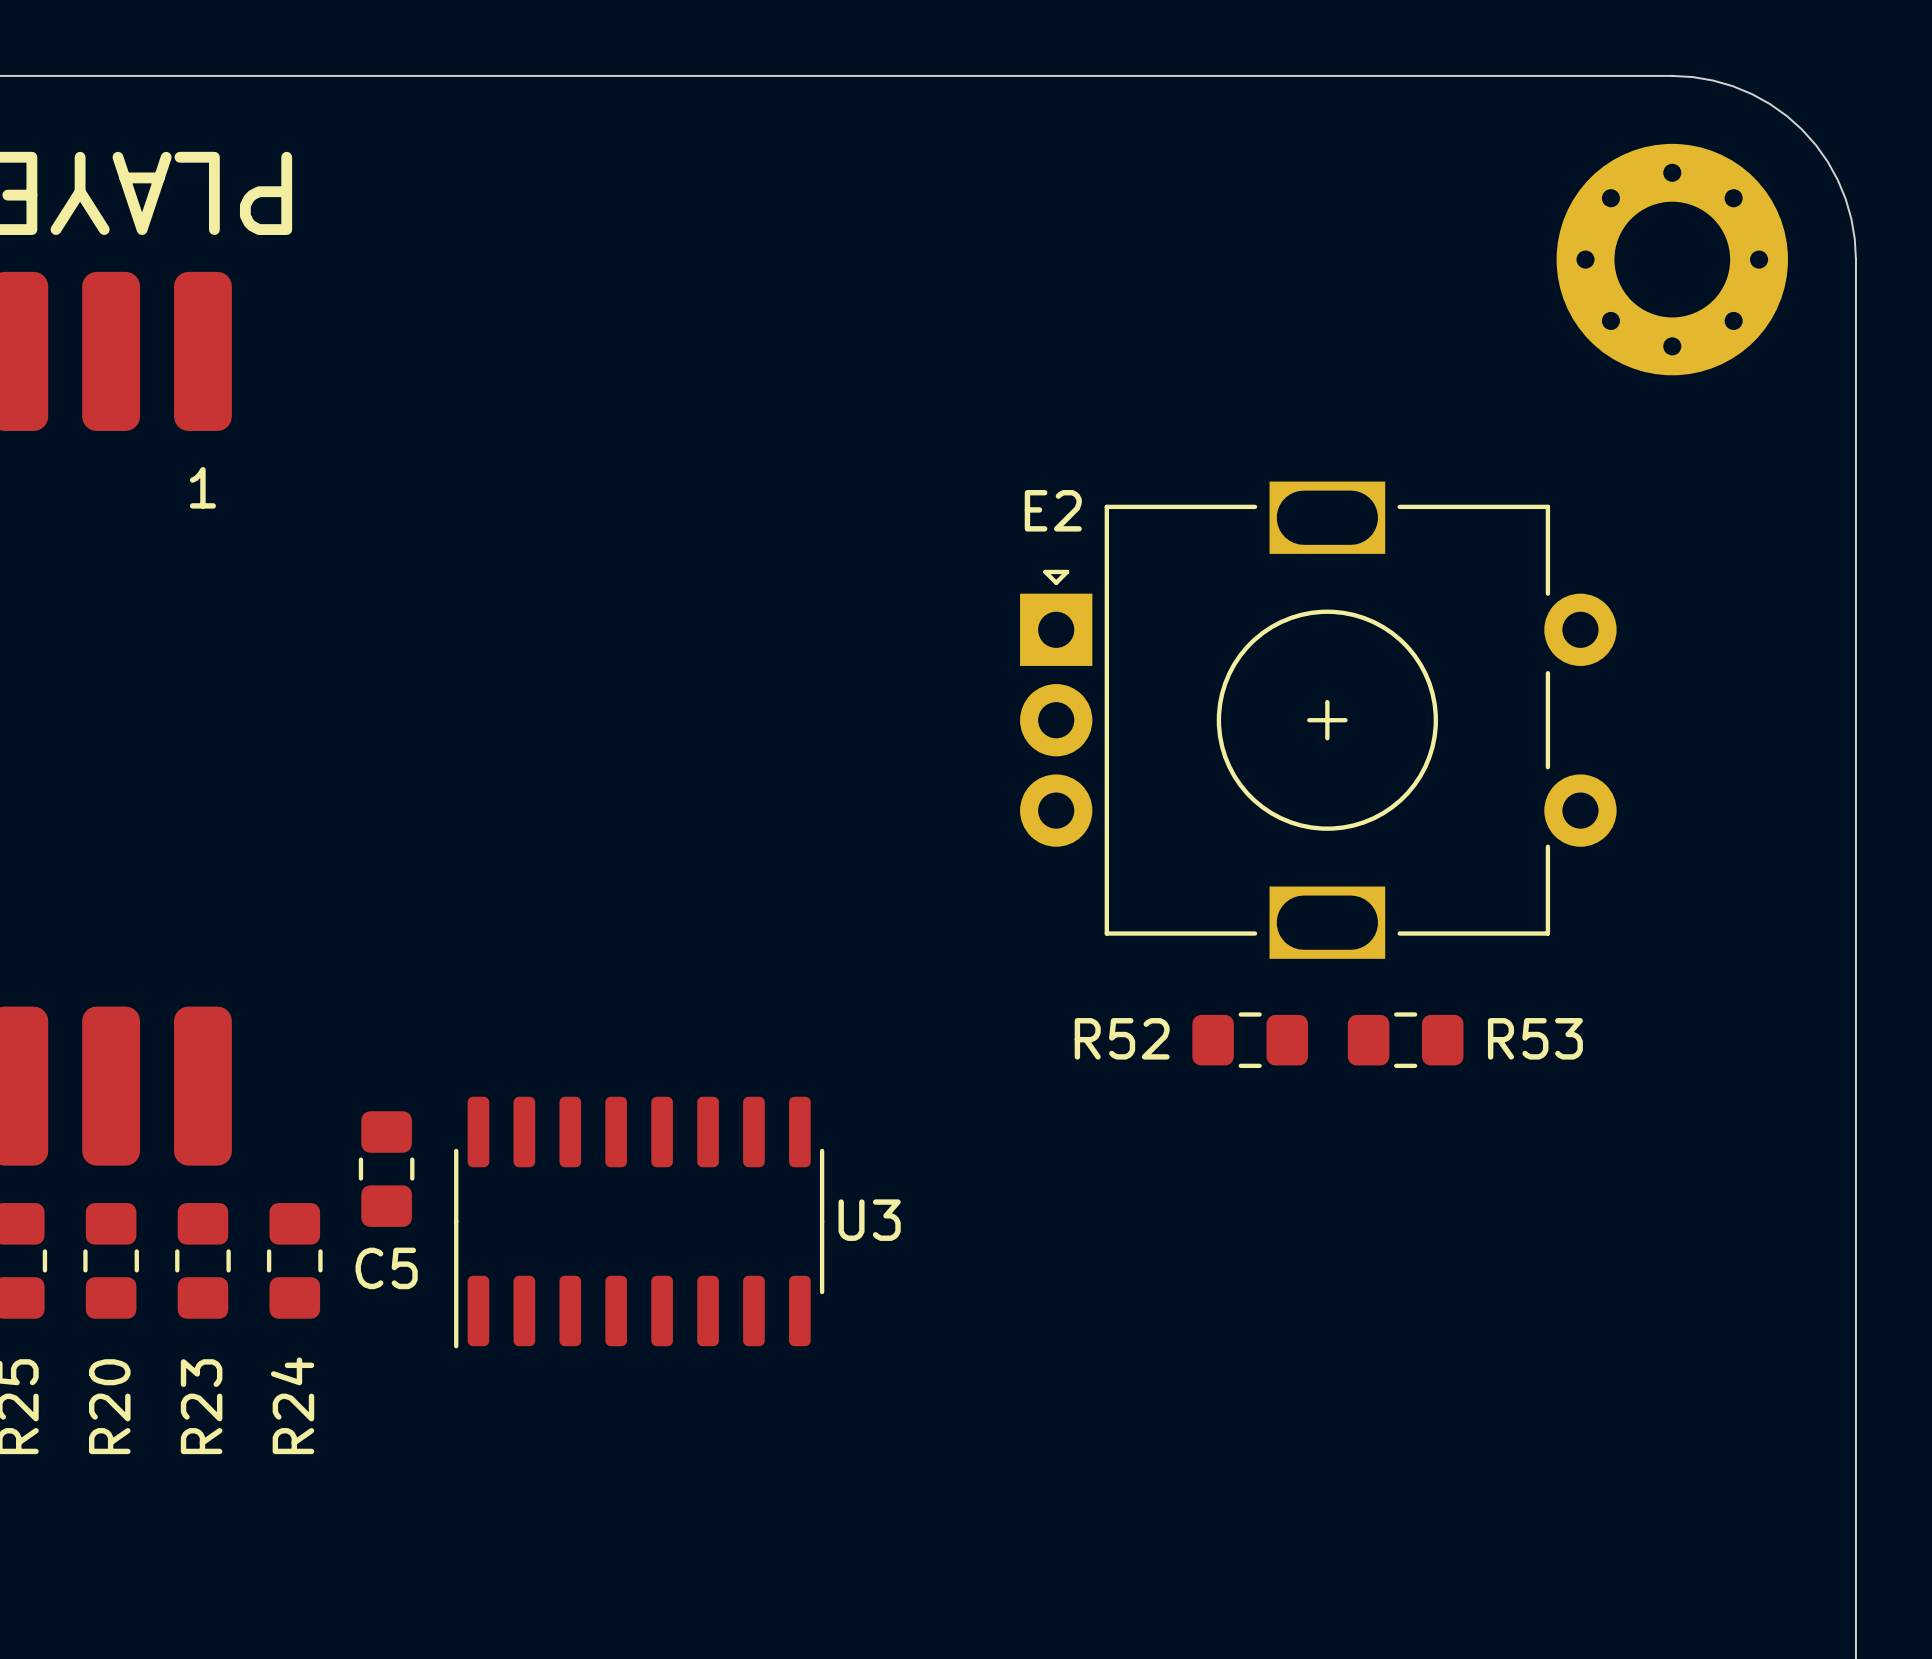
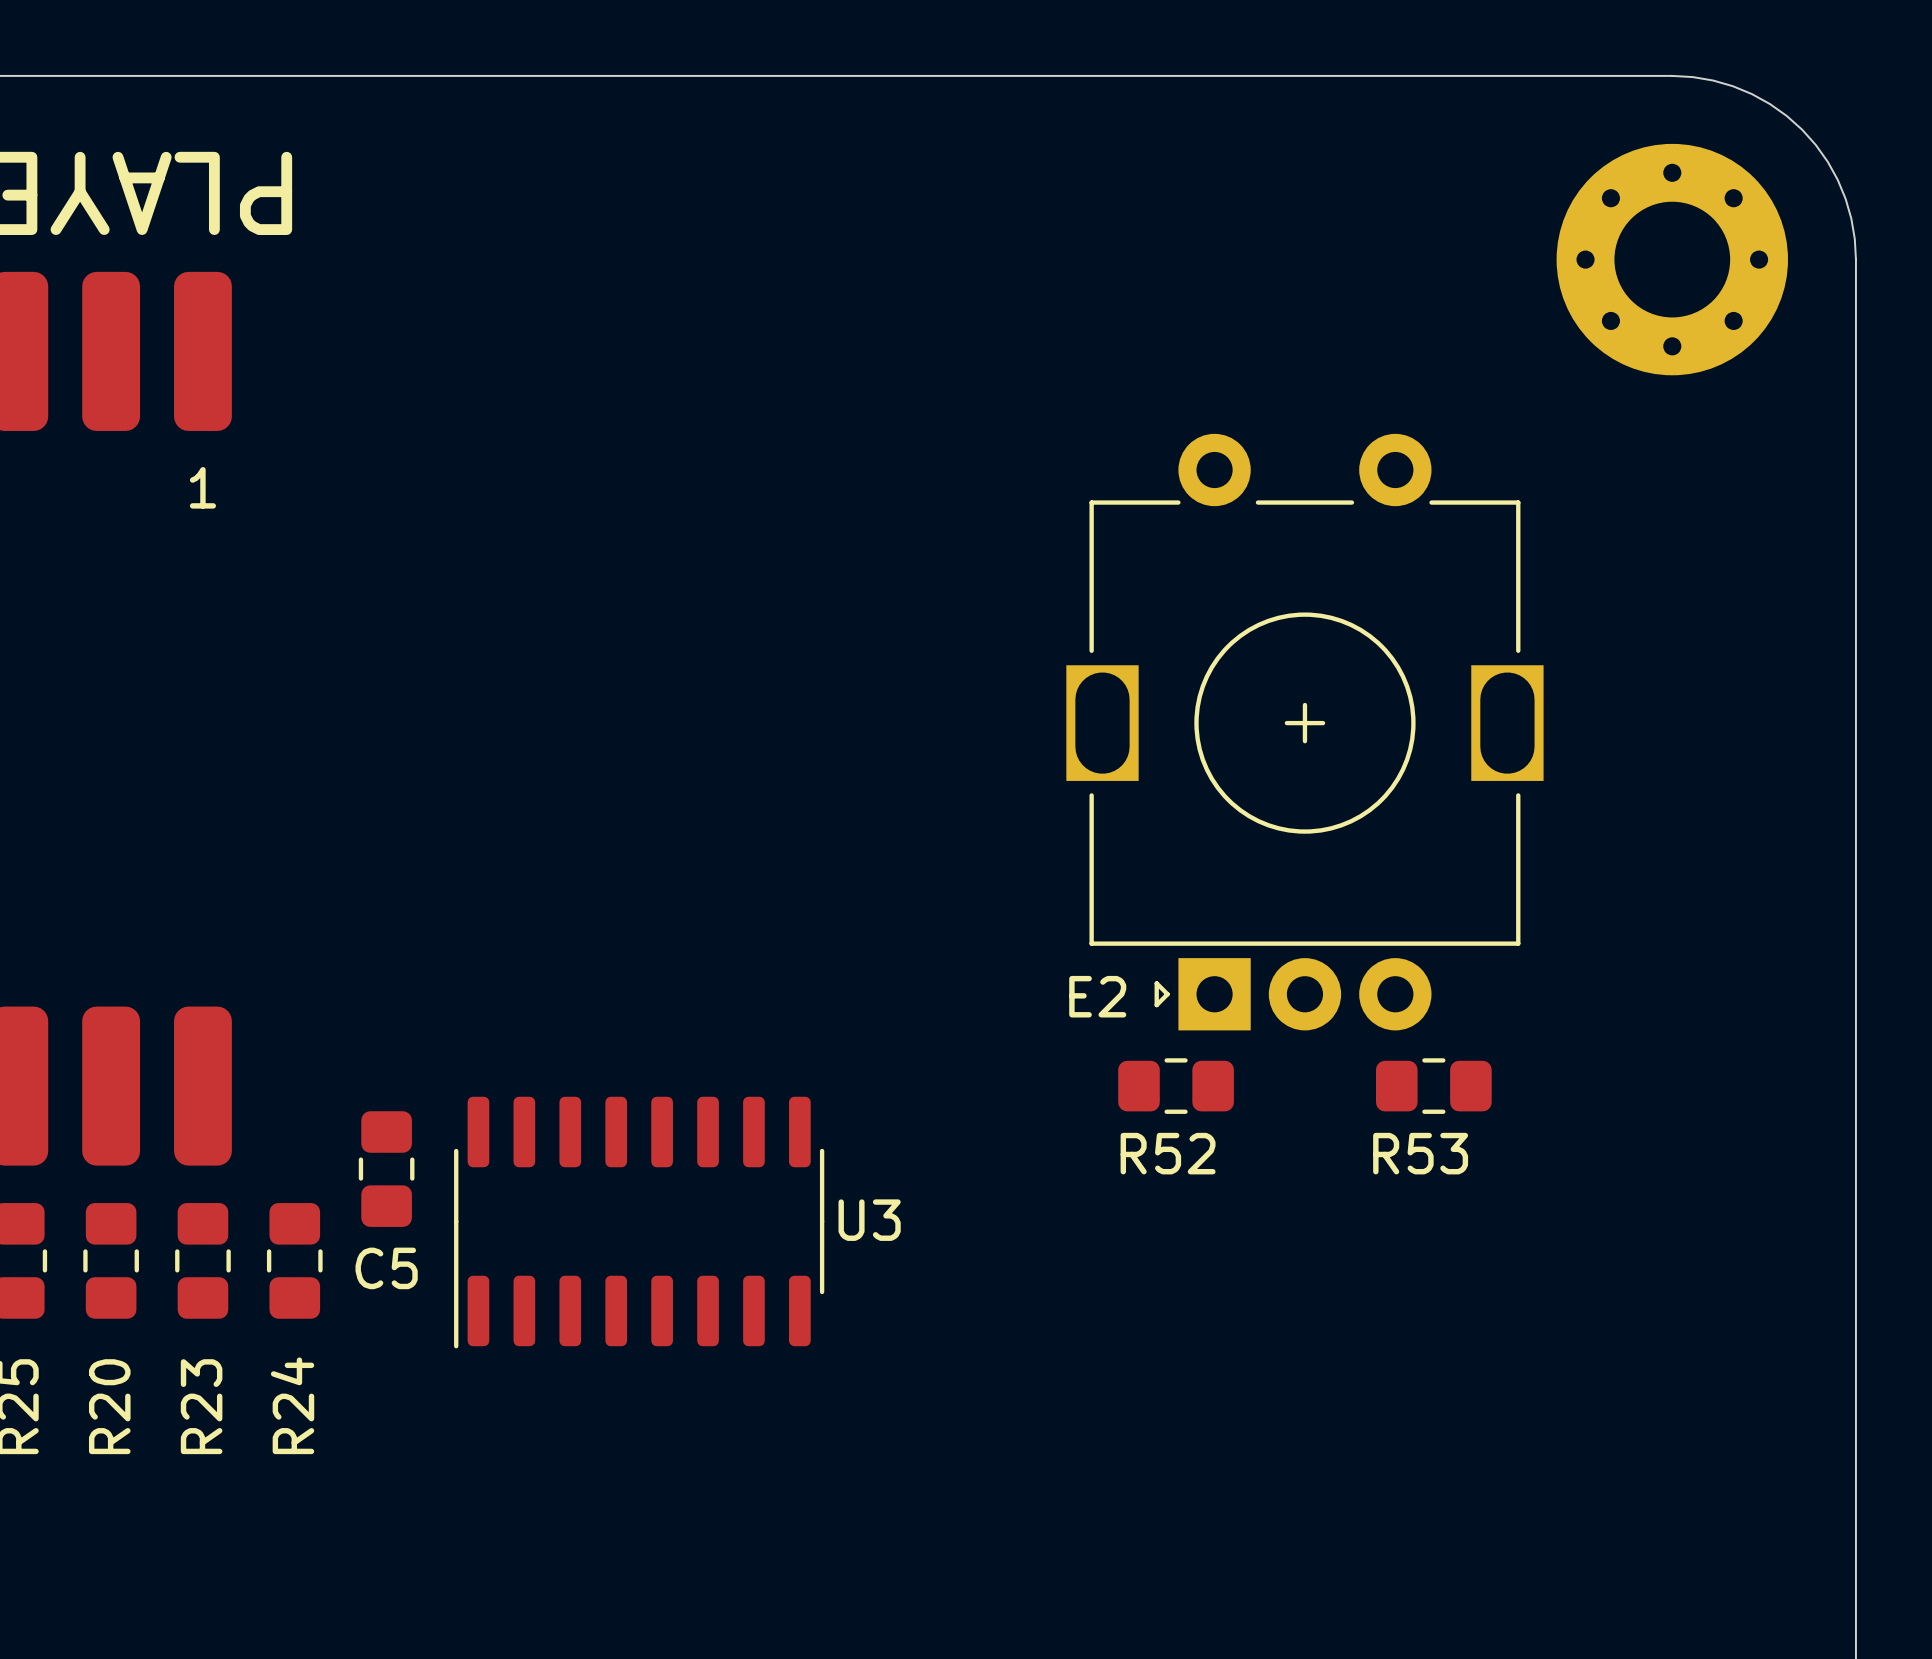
E2 rotation: 0° (1318, 720) -> 90° counterclockwise (1304, 732)
R52 name position: R52 (1122, 1038) -> R52 (1168, 1153)
R53 name position: R53 (1535, 1038) -> R53 (1420, 1153)
R52 position: (1250, 1040) -> (1176, 1086)
R53 position: (1405, 1040) -> (1433, 1086)

